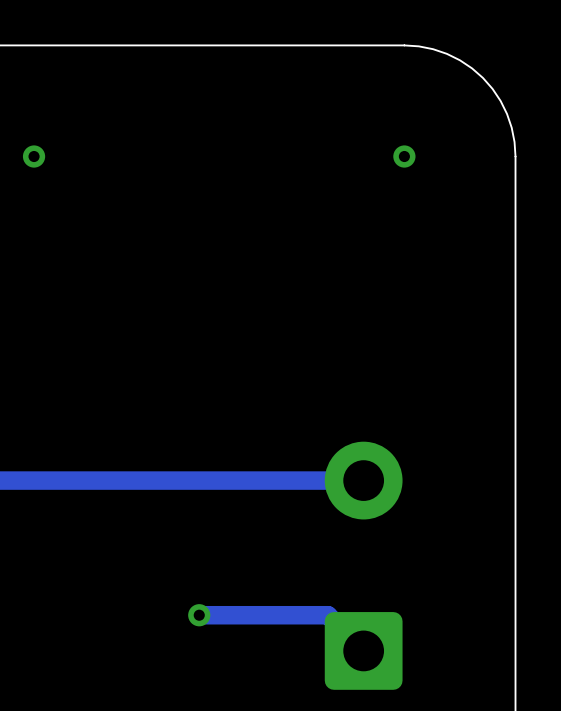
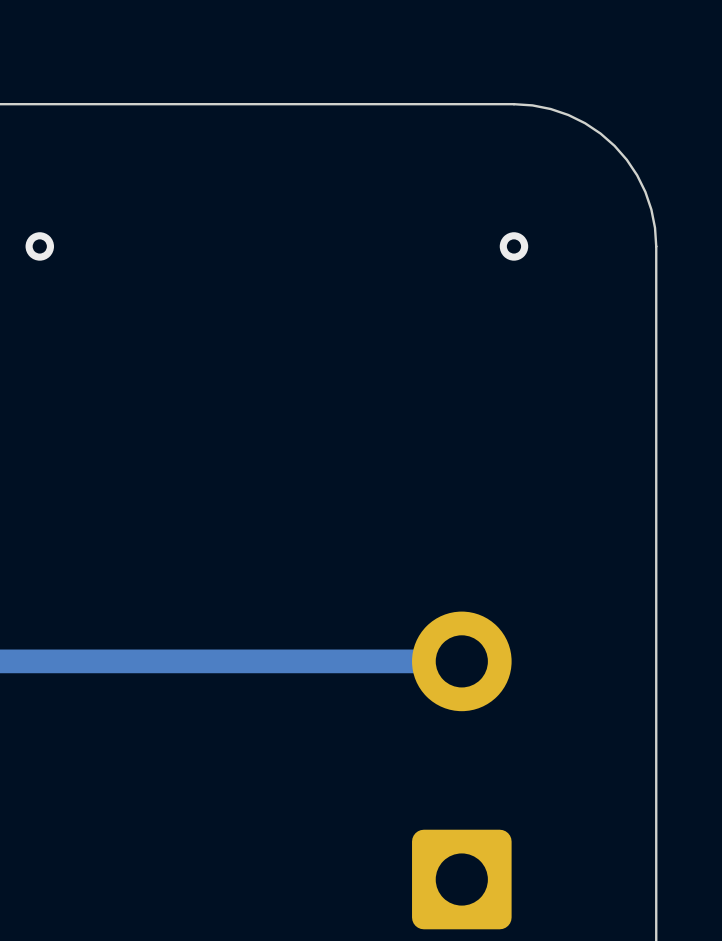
track: (199, 615) (327, 615) (363, 650) -> none
via: (199, 615) -> none

